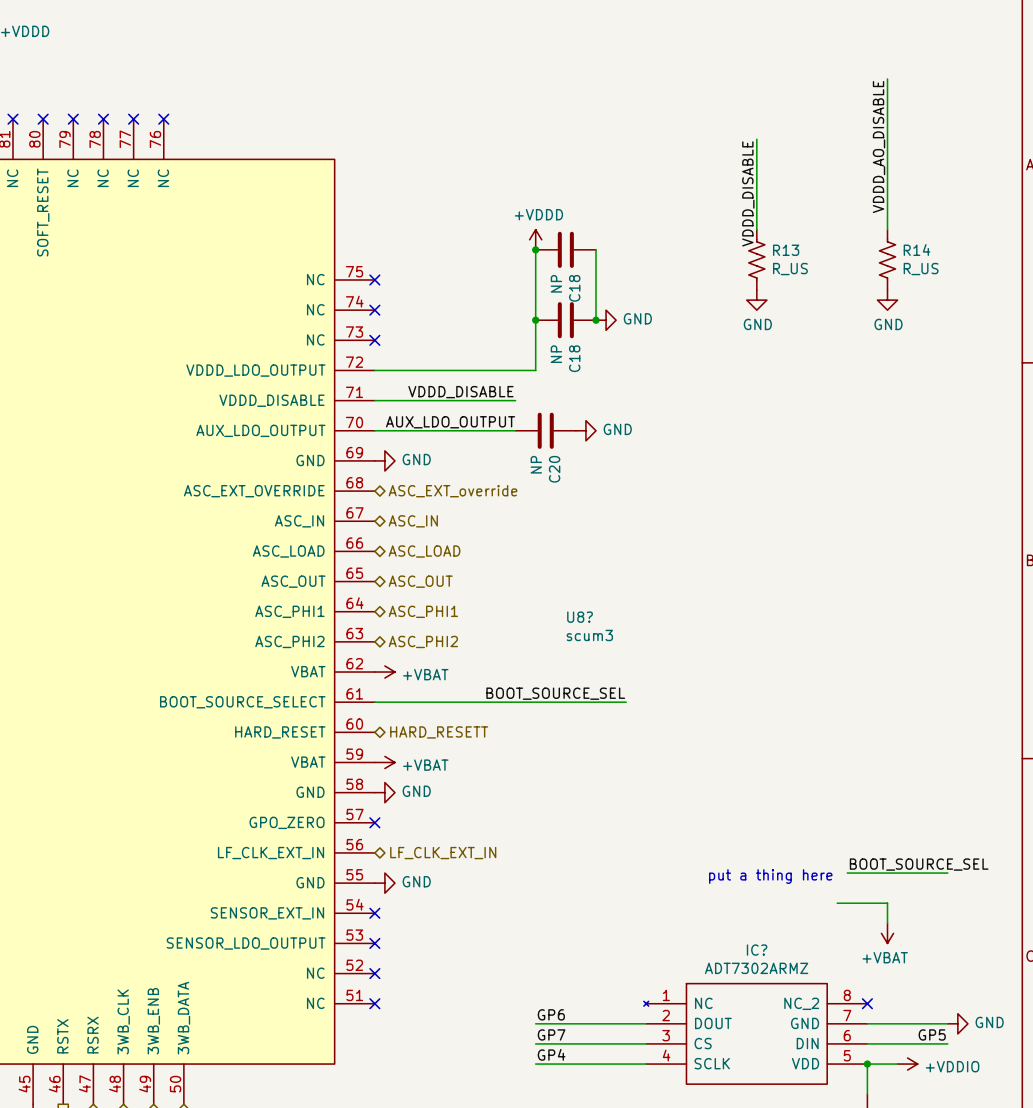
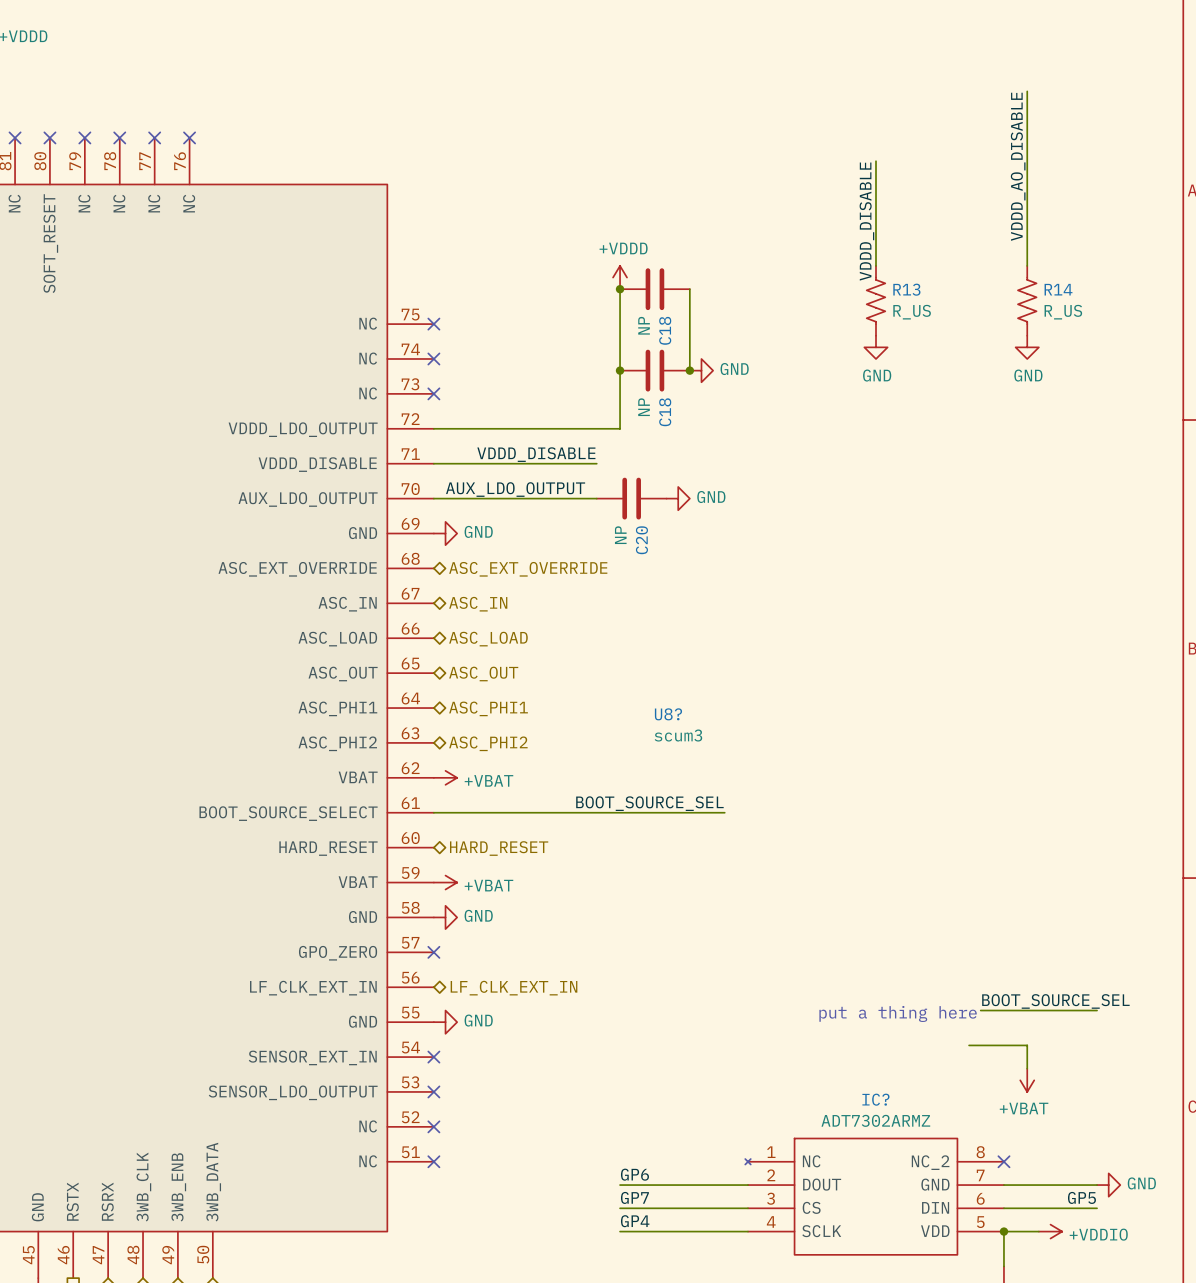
hierarchical label: ASC_EXT_override (453, 491) -> ASC_EXT_OVERRIDE (528, 569)
hierarchical label: HARD_RESETT (439, 732) -> HARD_RESET (499, 848)

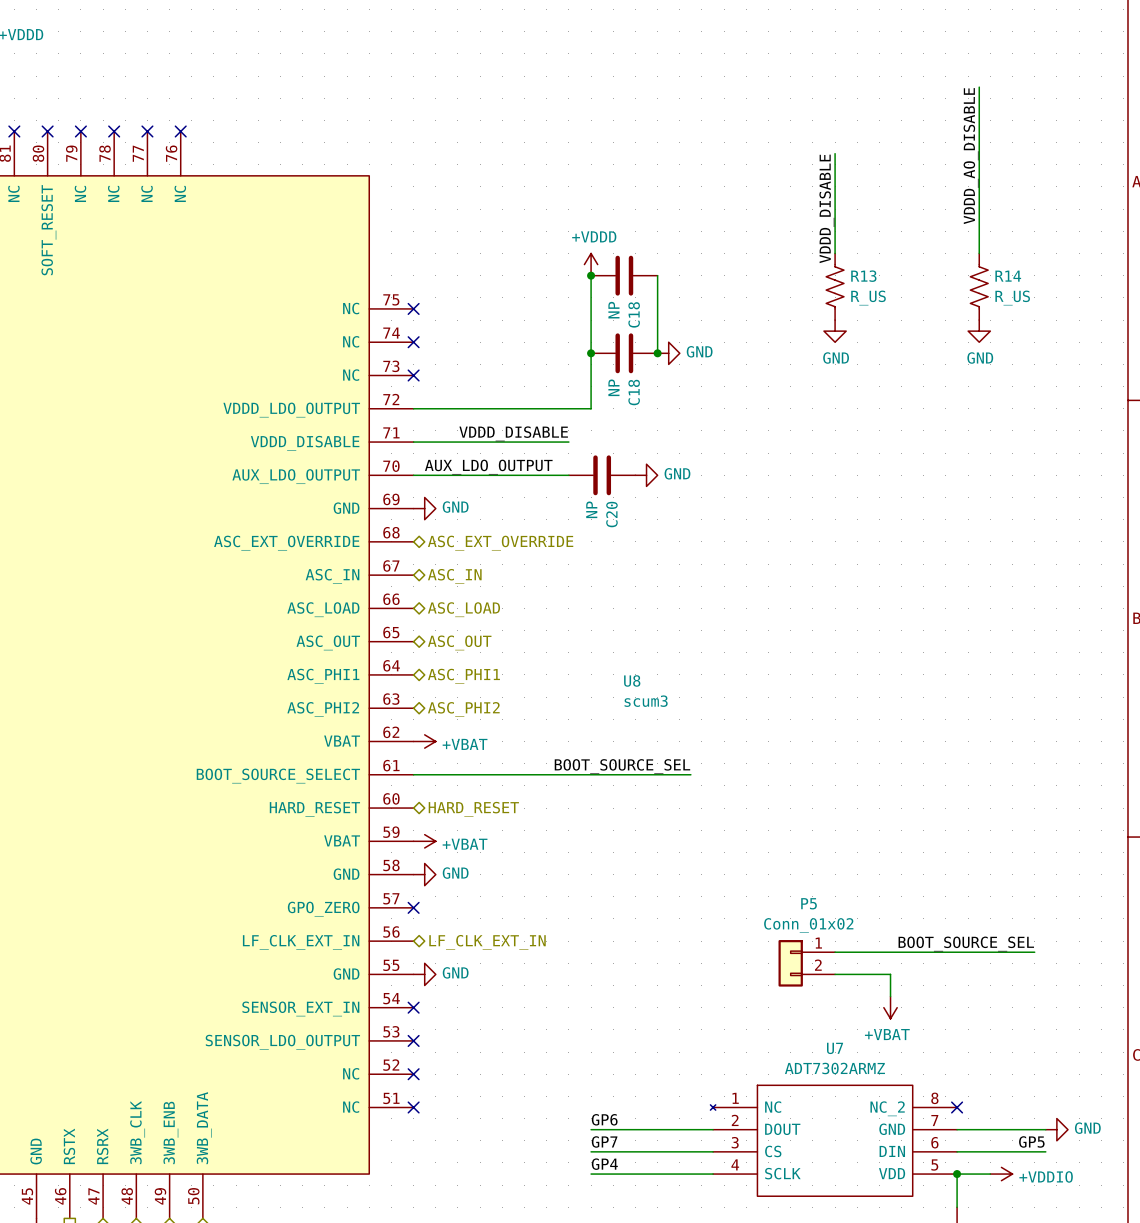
U8? name: U8? (668, 714) -> U8 (632, 680)
wire: none -> (835, 952) (1034, 952)
label position: BOOT_SOURCE_SEL (1055, 1001) -> BOOT_SOURCE_SEL (966, 944)
P5: none -> Conn_01x02 (806, 963)
wire: (980, 1010) (1097, 1010) -> none
text: put a thing here (898, 1013) -> none
wire: (969, 1045) (1027, 1045) (1027, 1068) -> (835, 974) (890, 974) (890, 996)
power symbol position: +VBAT (1027, 1080) -> +VBAT (890, 1007)
IC? name: IC? (875, 1099) -> U7 (835, 1048)

